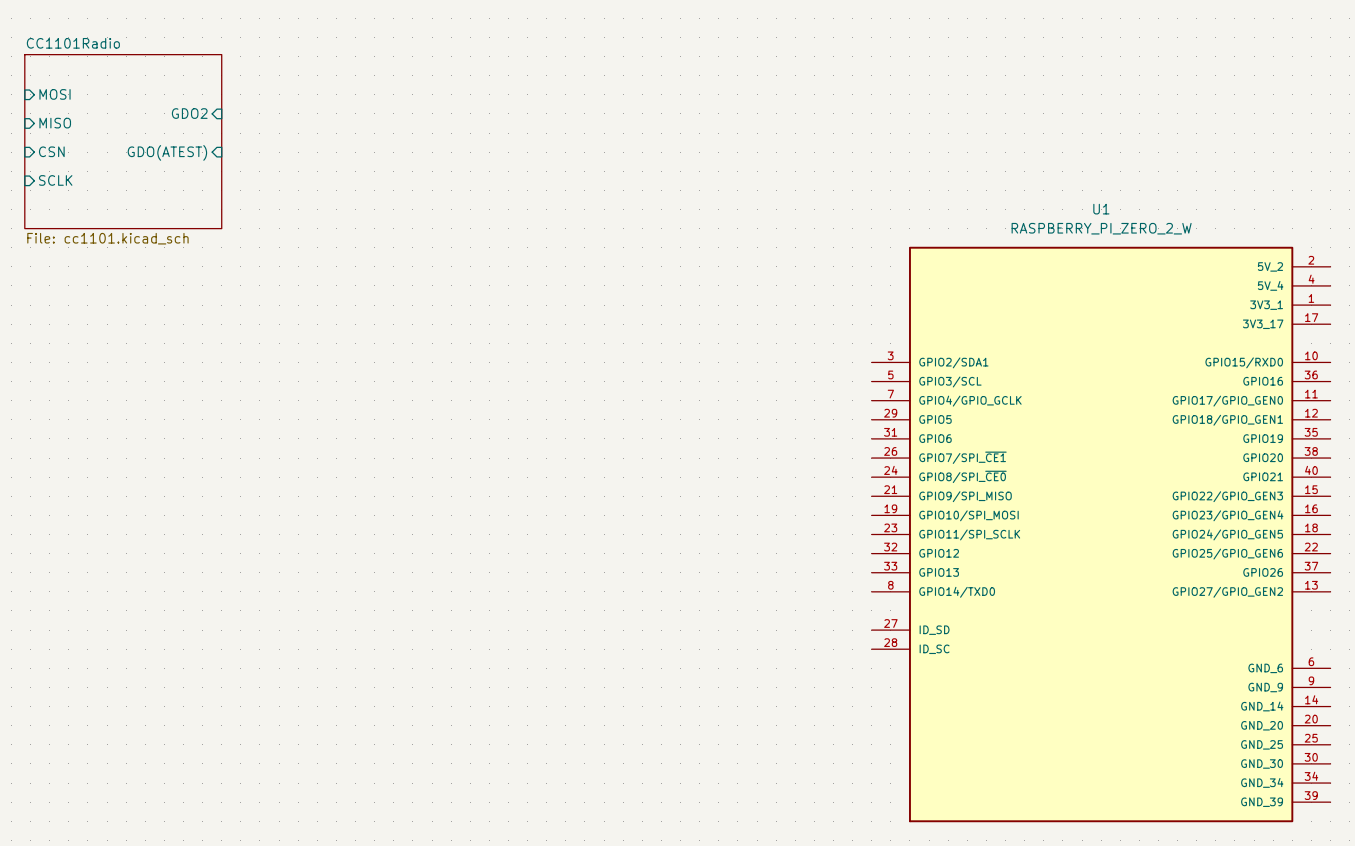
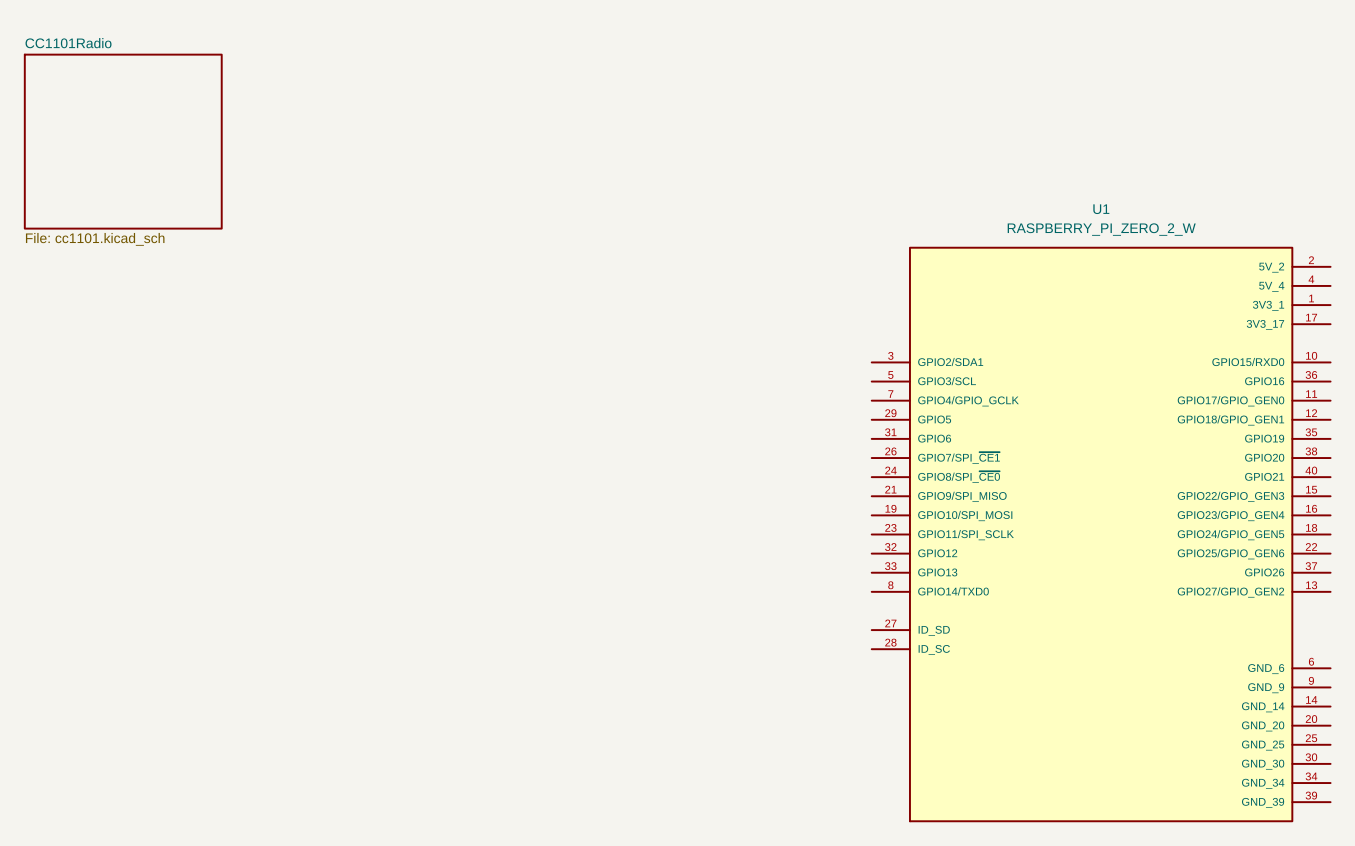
sheet pin: MOSI (55, 94) -> none
sheet pin: GDO2 (189, 113) -> none
sheet pin: MISO (55, 123) -> none
sheet pin: CSN (51, 151) -> none
sheet pin: GDO(ATEST) (167, 152) -> none
sheet pin: SCLK (55, 180) -> none

